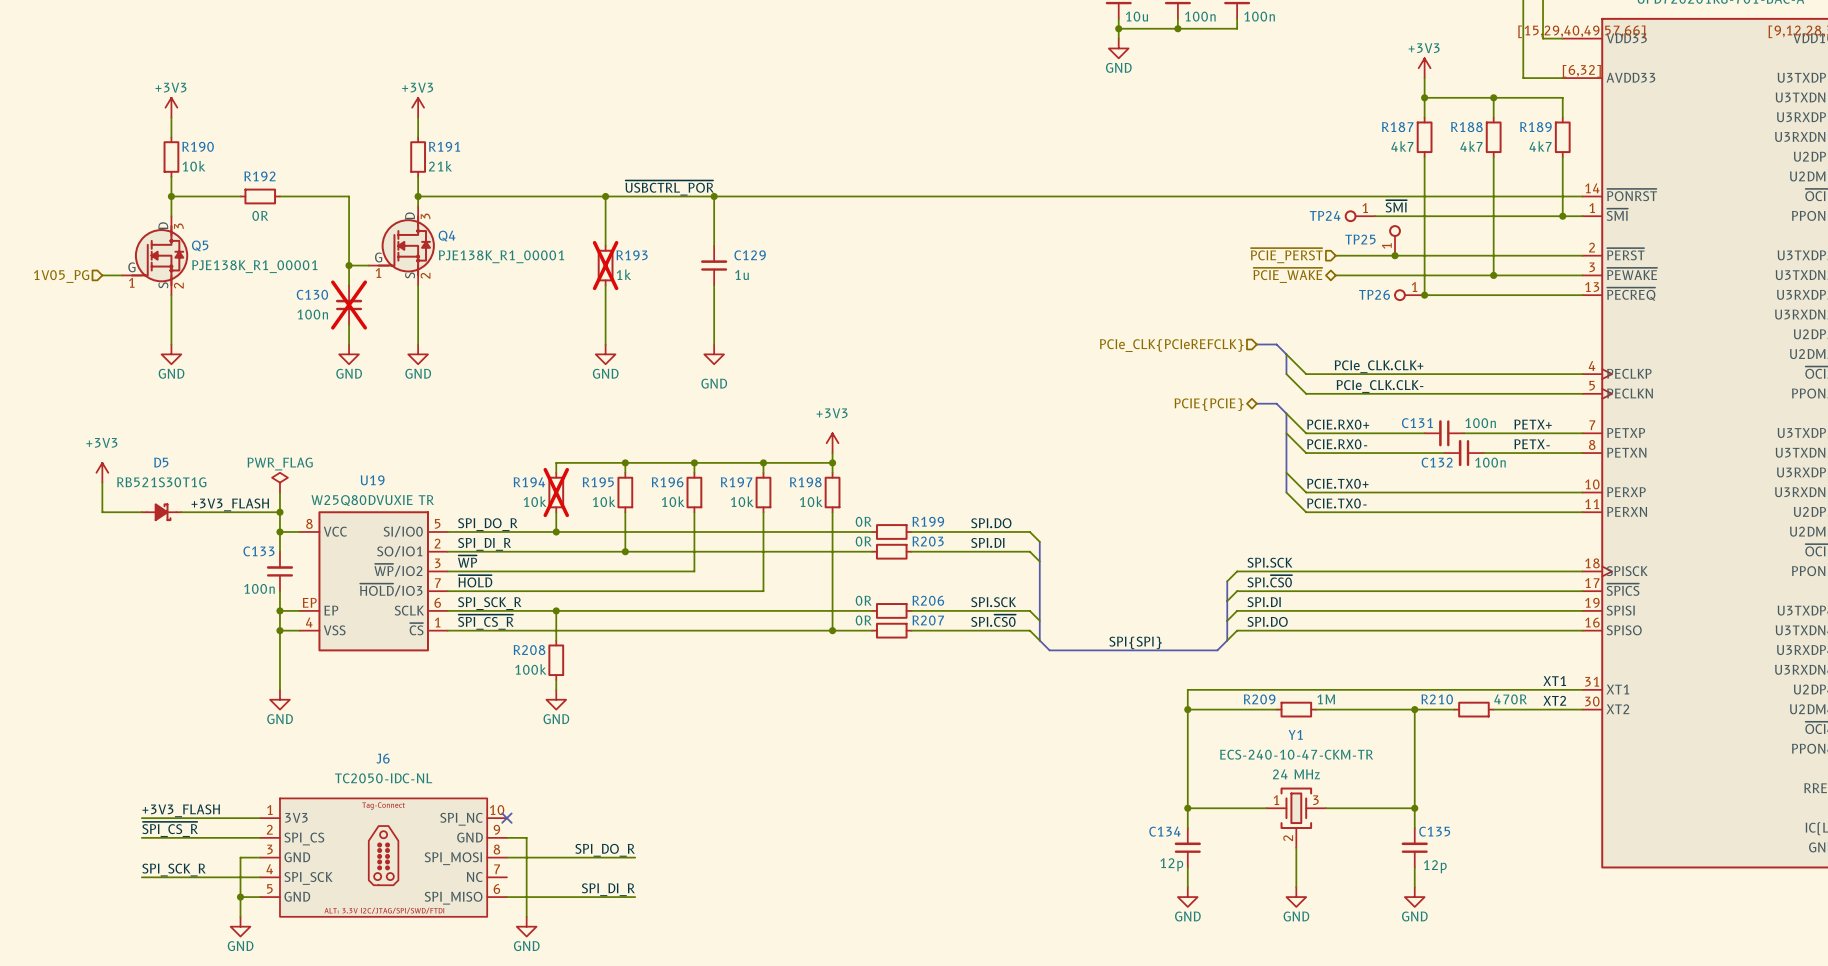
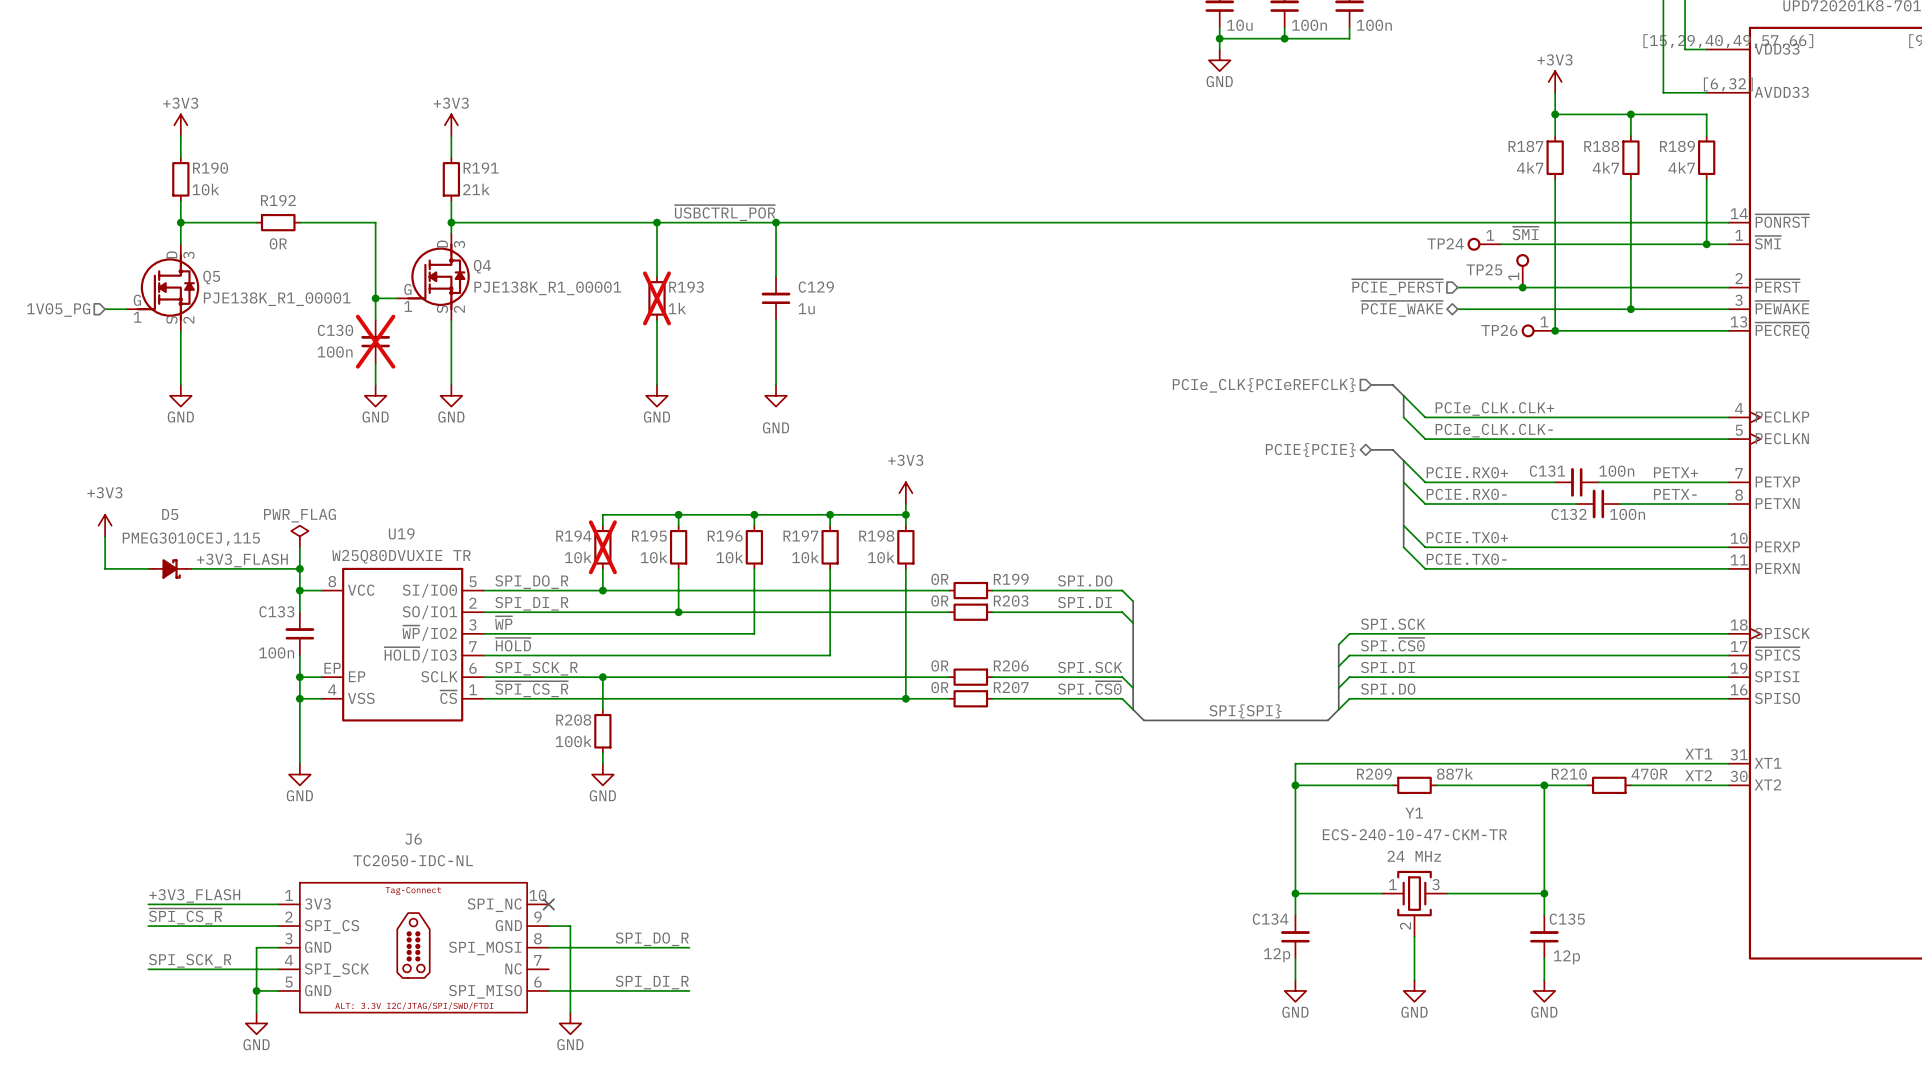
D5 text: RB521S30T1G (161, 482) -> PMEG3010CEJ,115 (191, 539)
R209 text: 1M (1326, 699) -> 887k (1454, 773)

